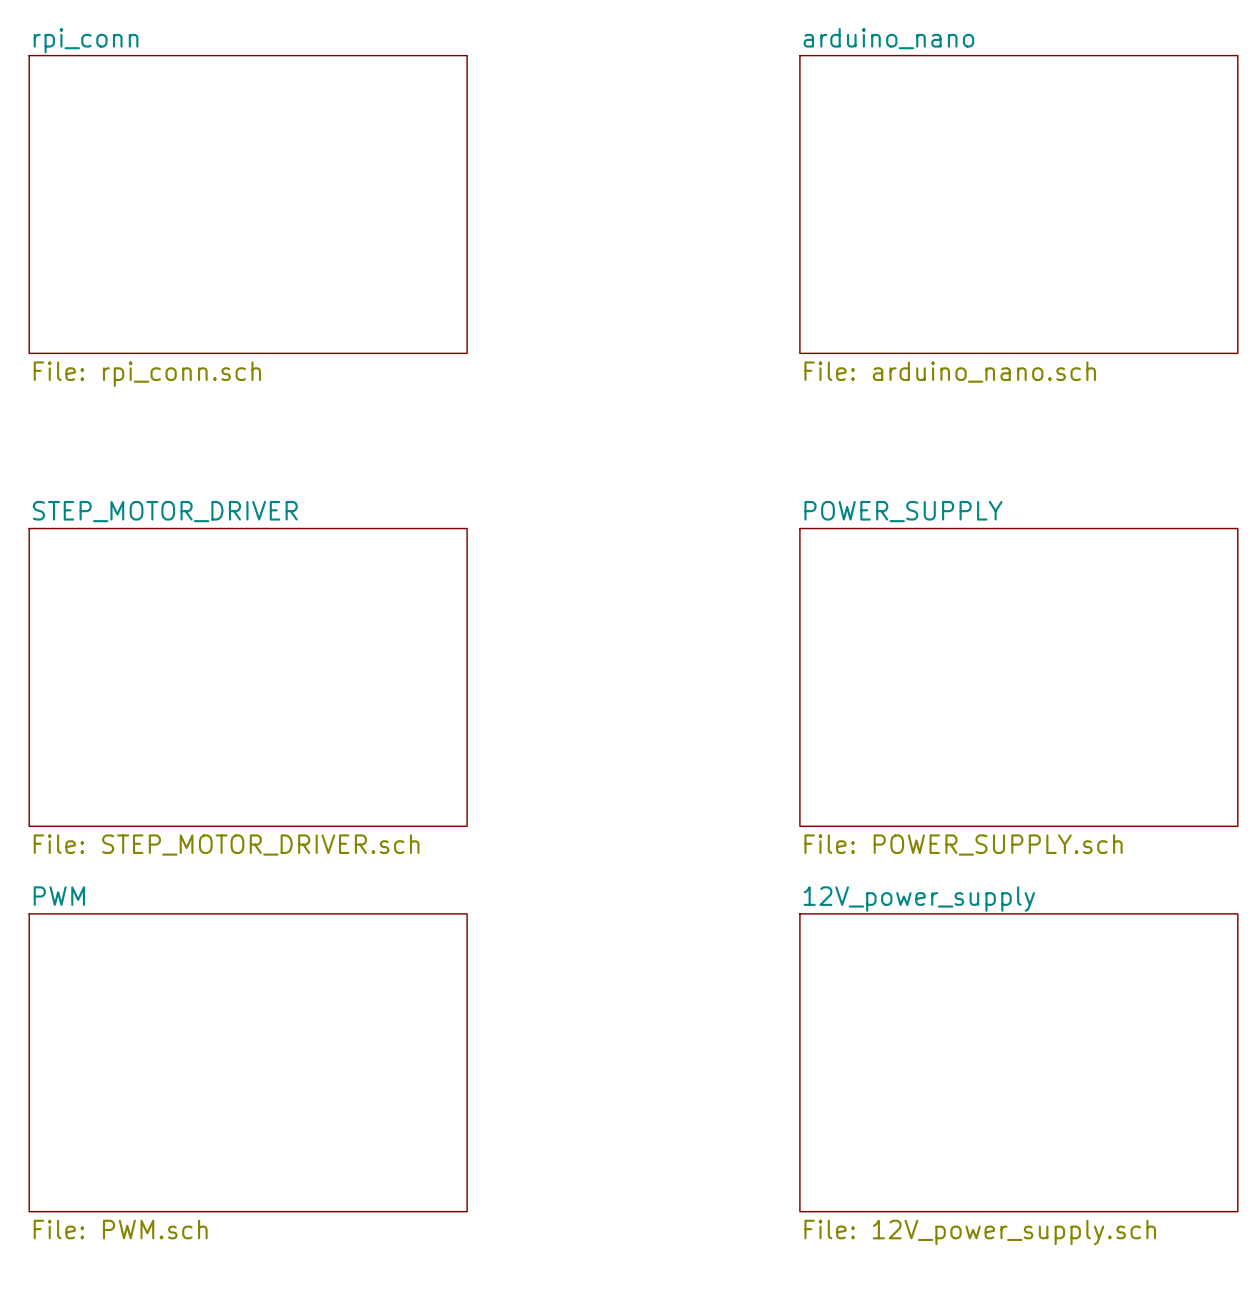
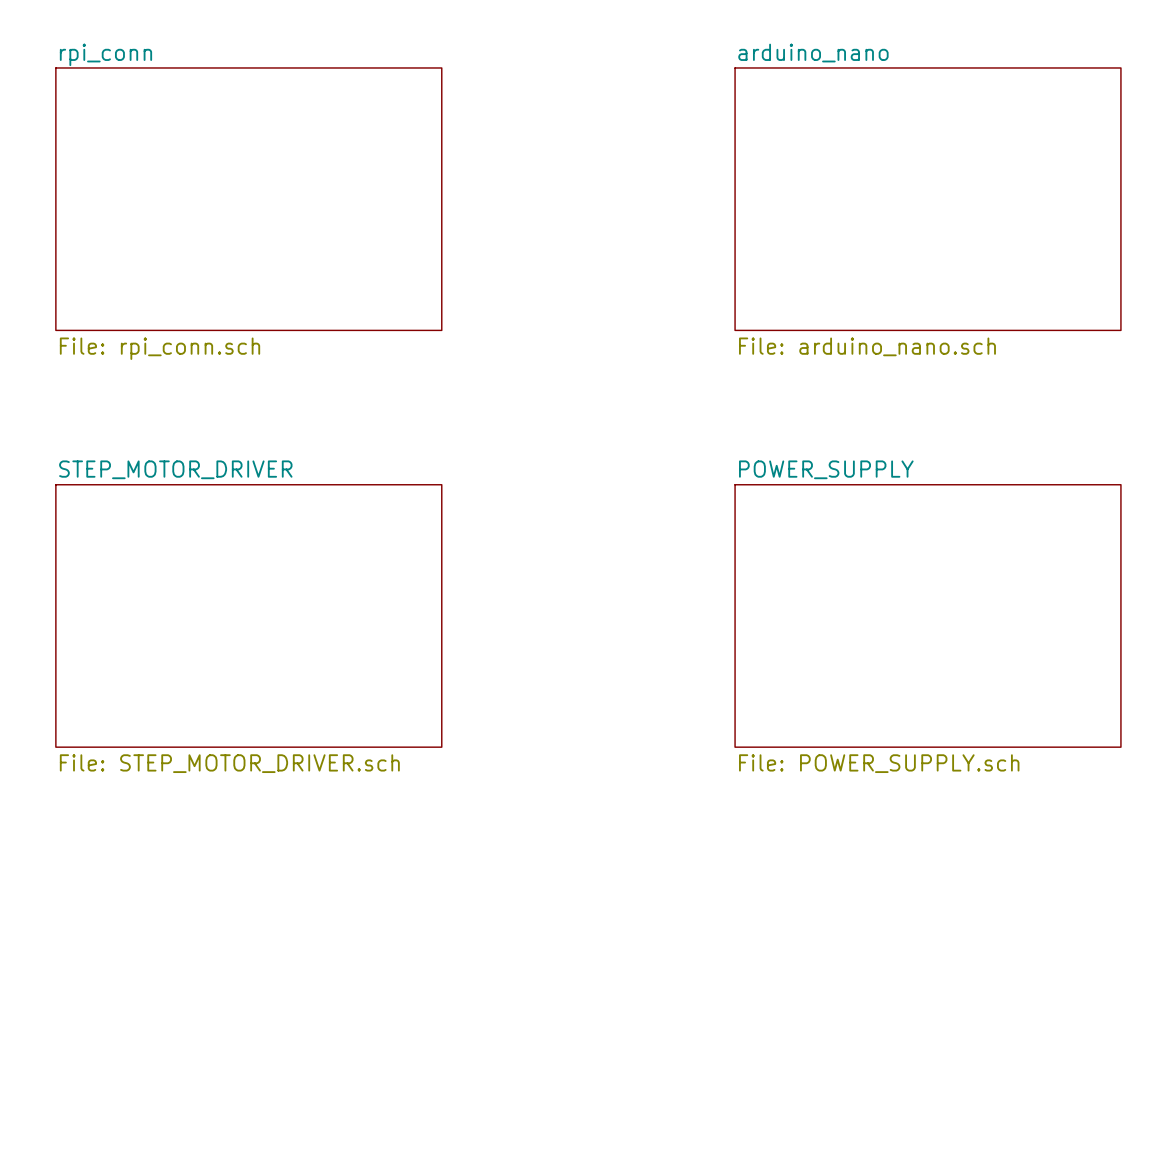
sheet PWM: File: PWM.sch (248, 1062) -> none
sheet 12V_power_supply: File: 12V_power_supply.sch (1018, 1062) -> none

